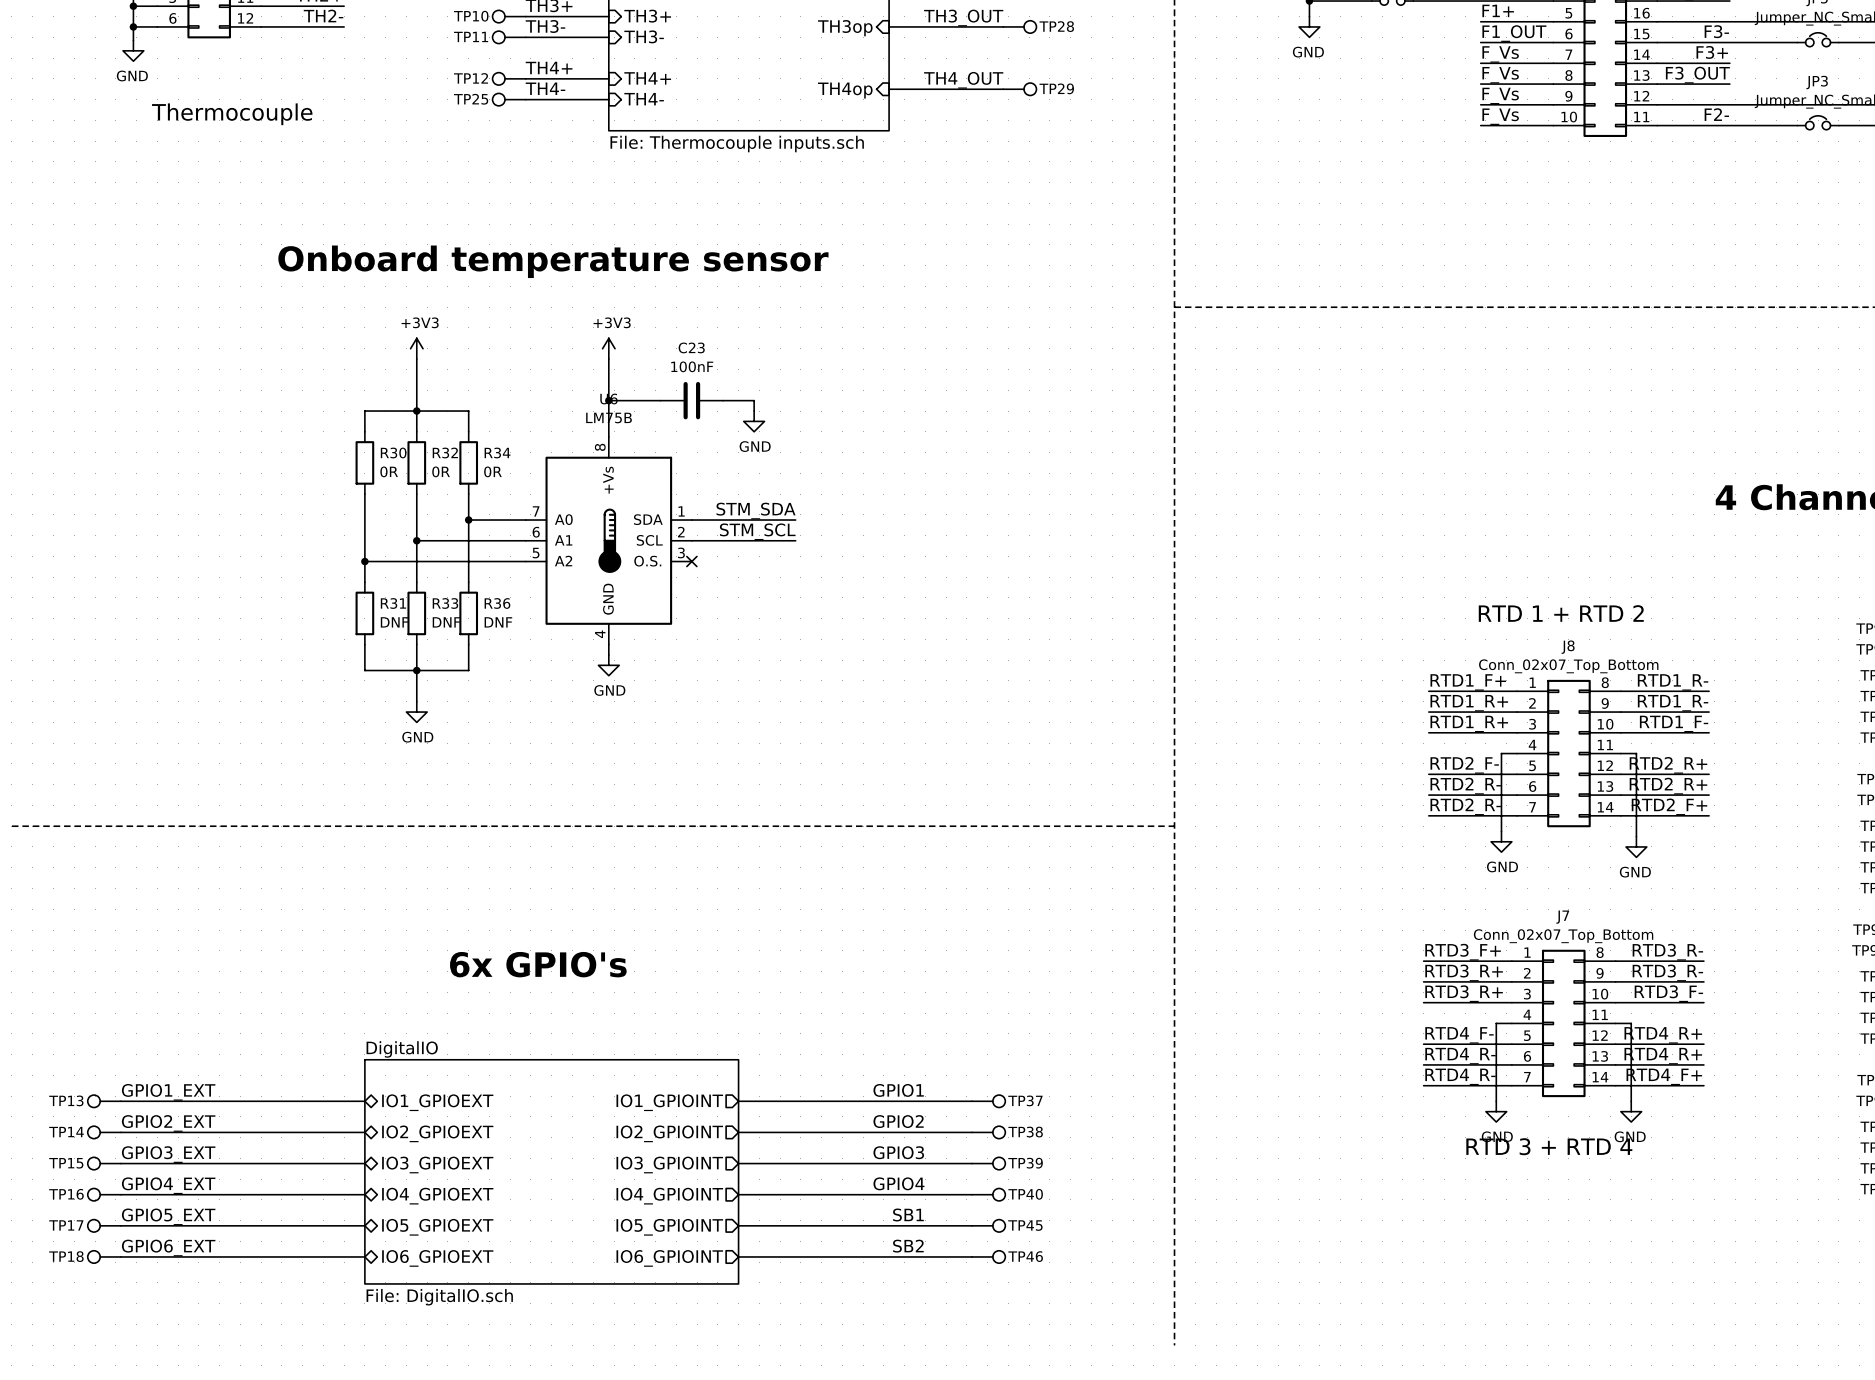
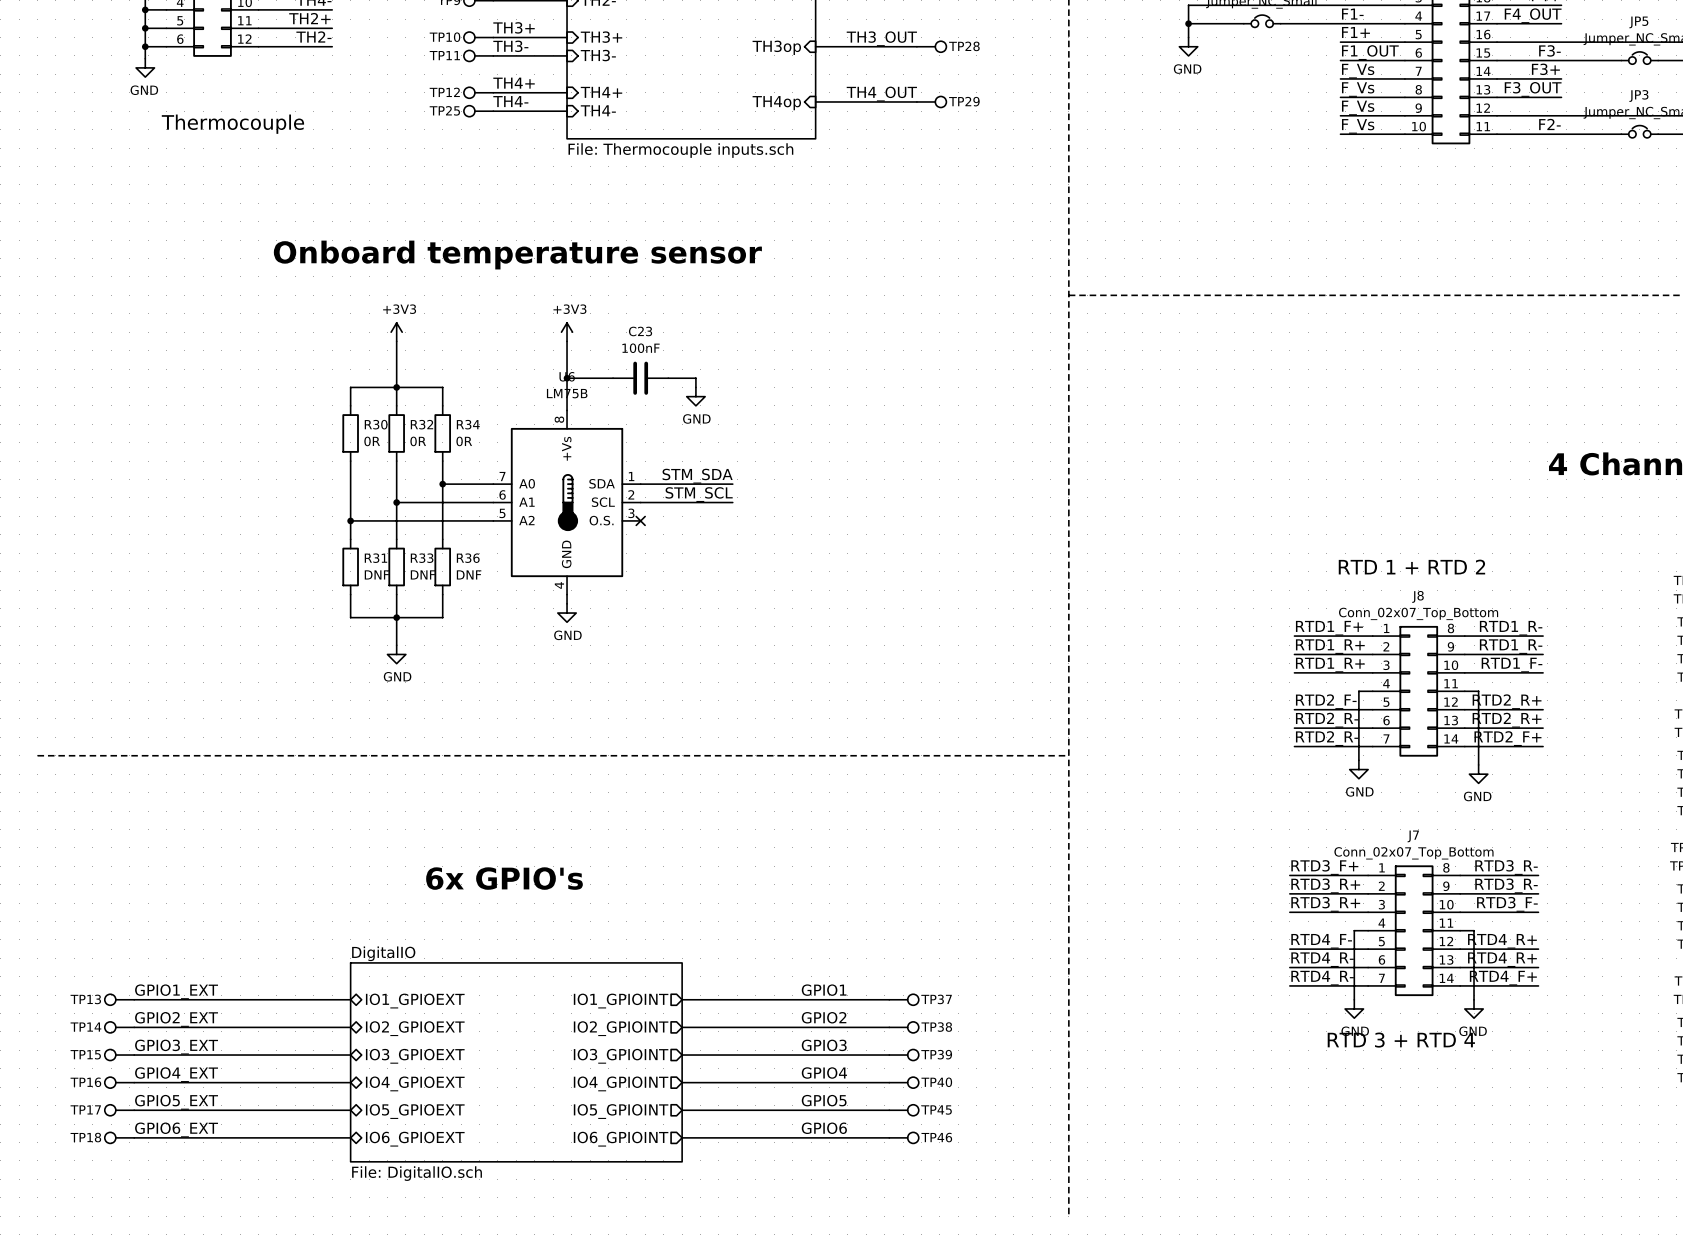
label: SB1 (908, 1214) -> GPIO5 (824, 1100)
label: SB2 (908, 1246) -> GPIO6 (824, 1128)

